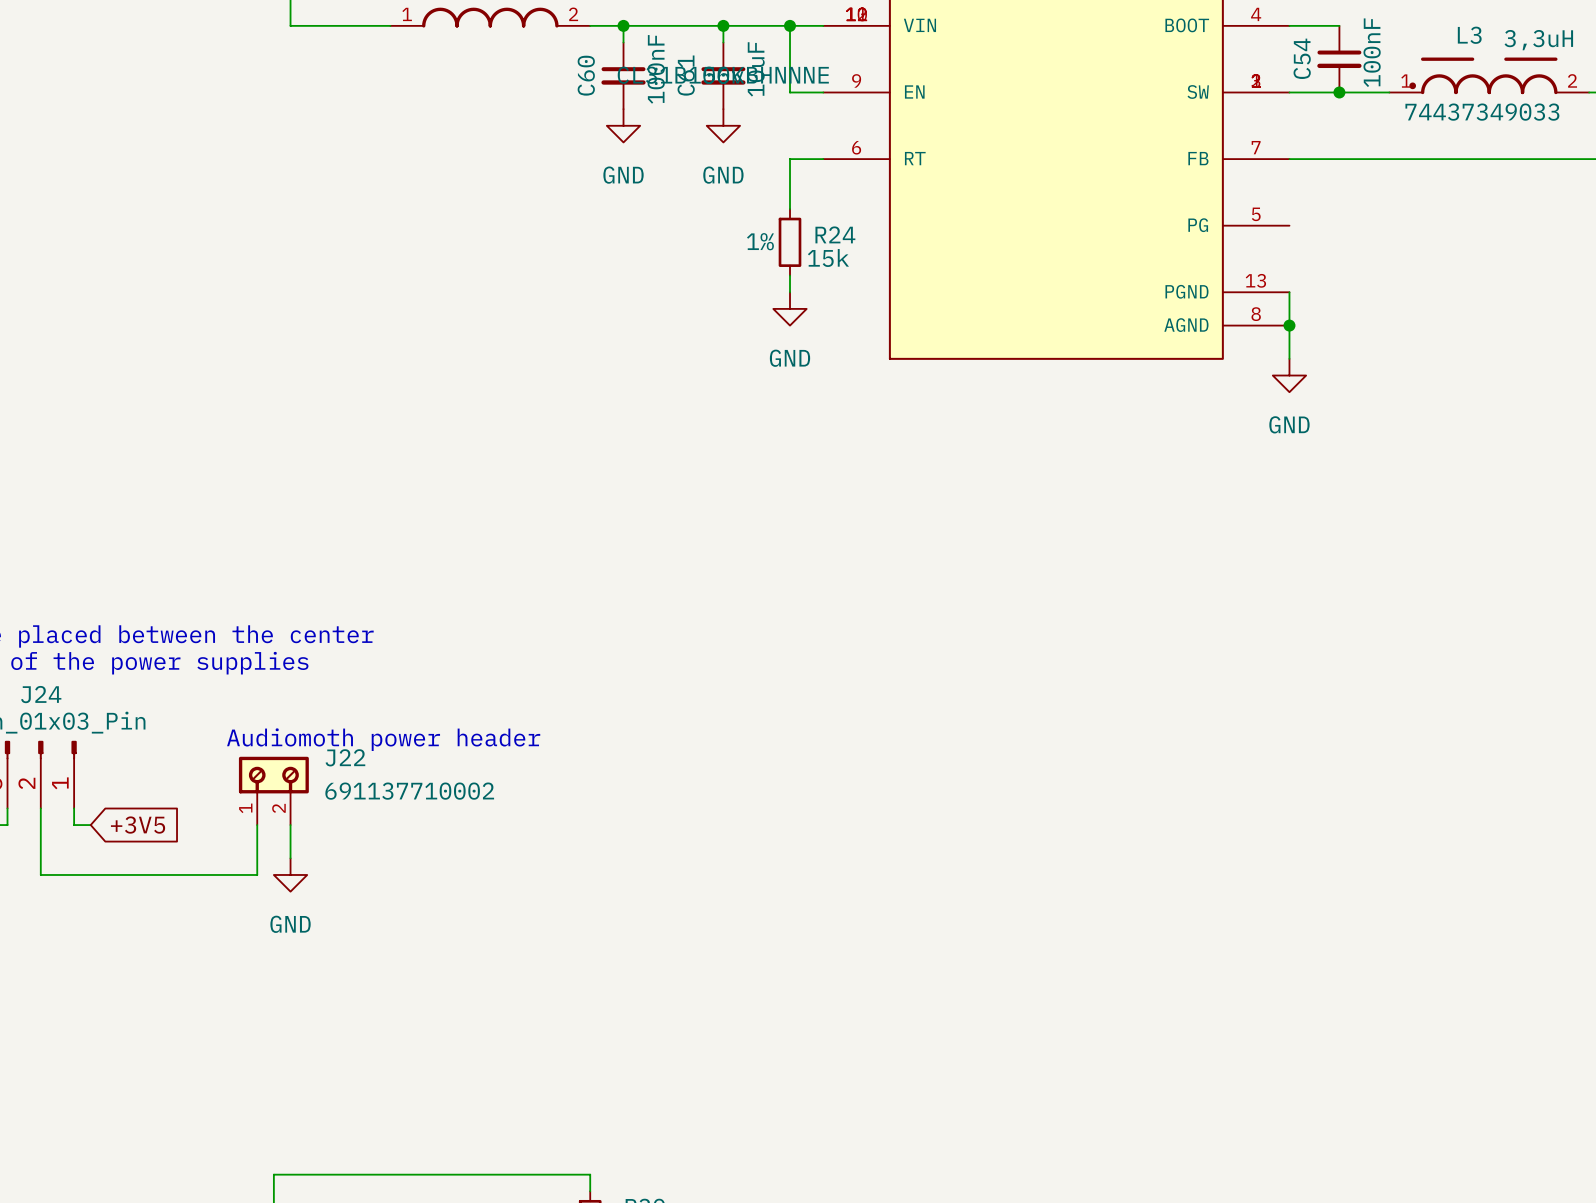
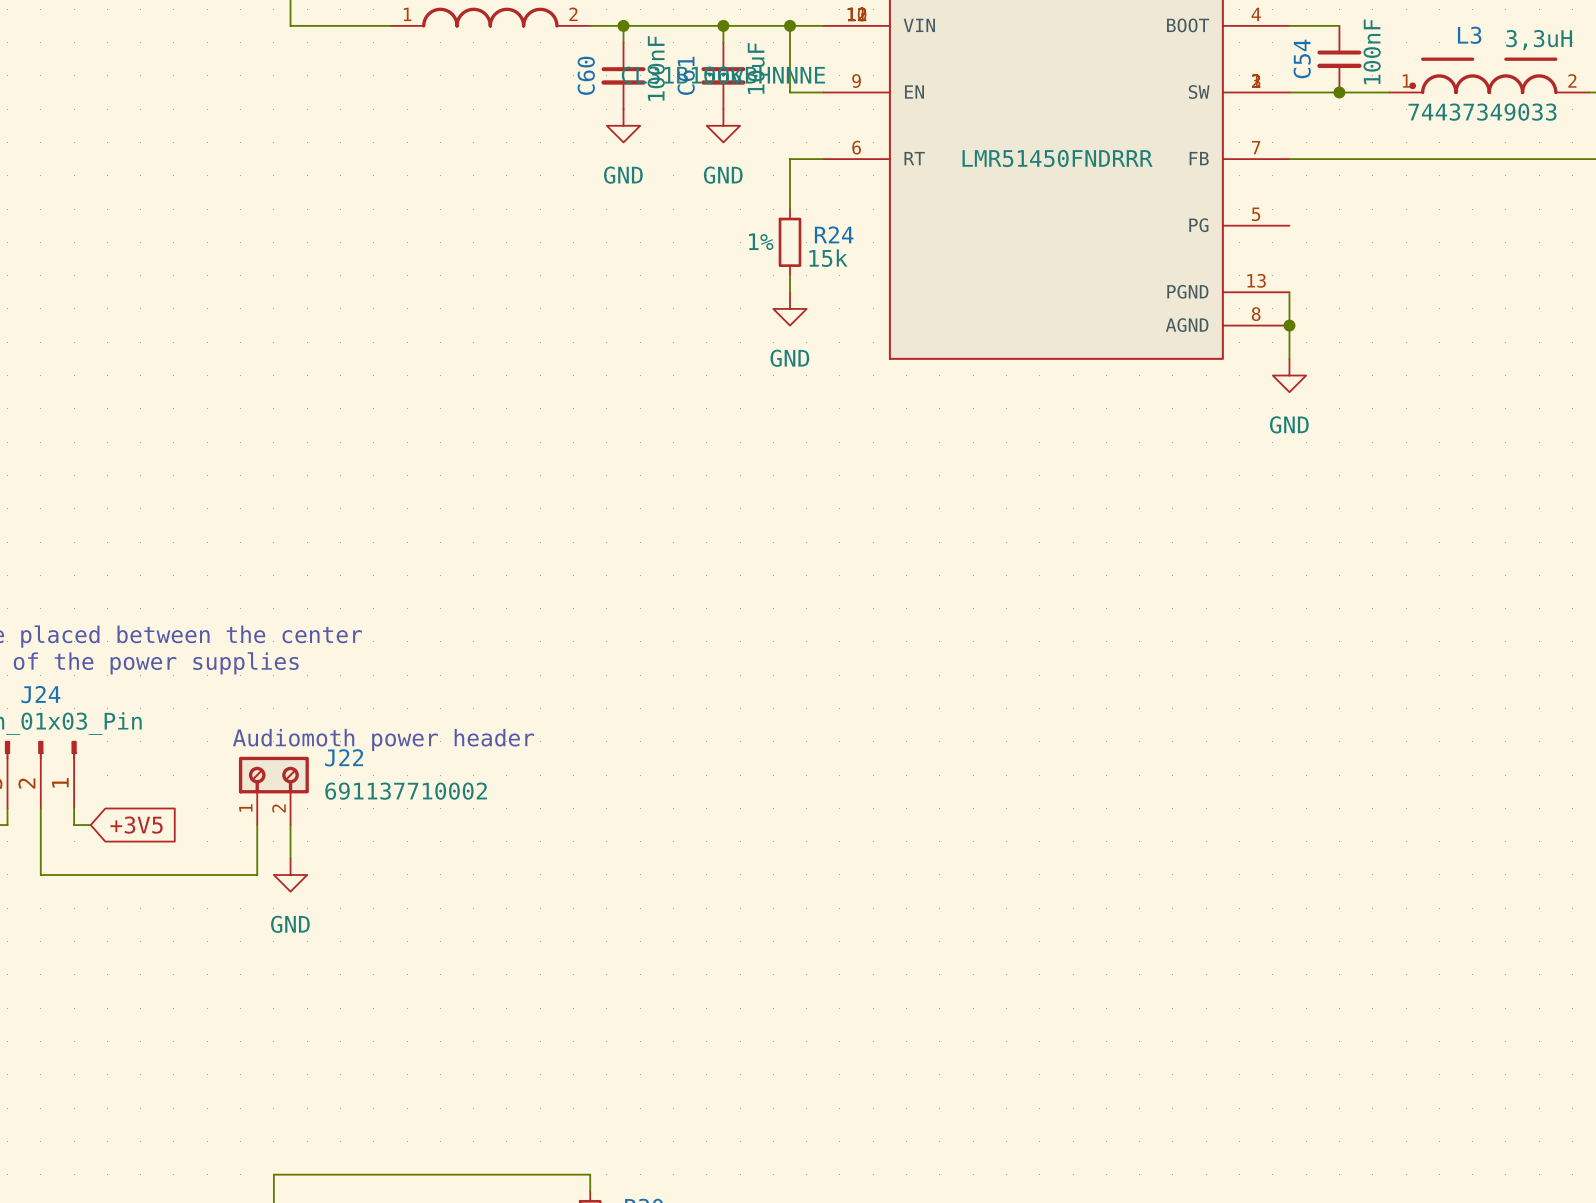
part text: none -> LMR51450FNDRRR (1057, 158)

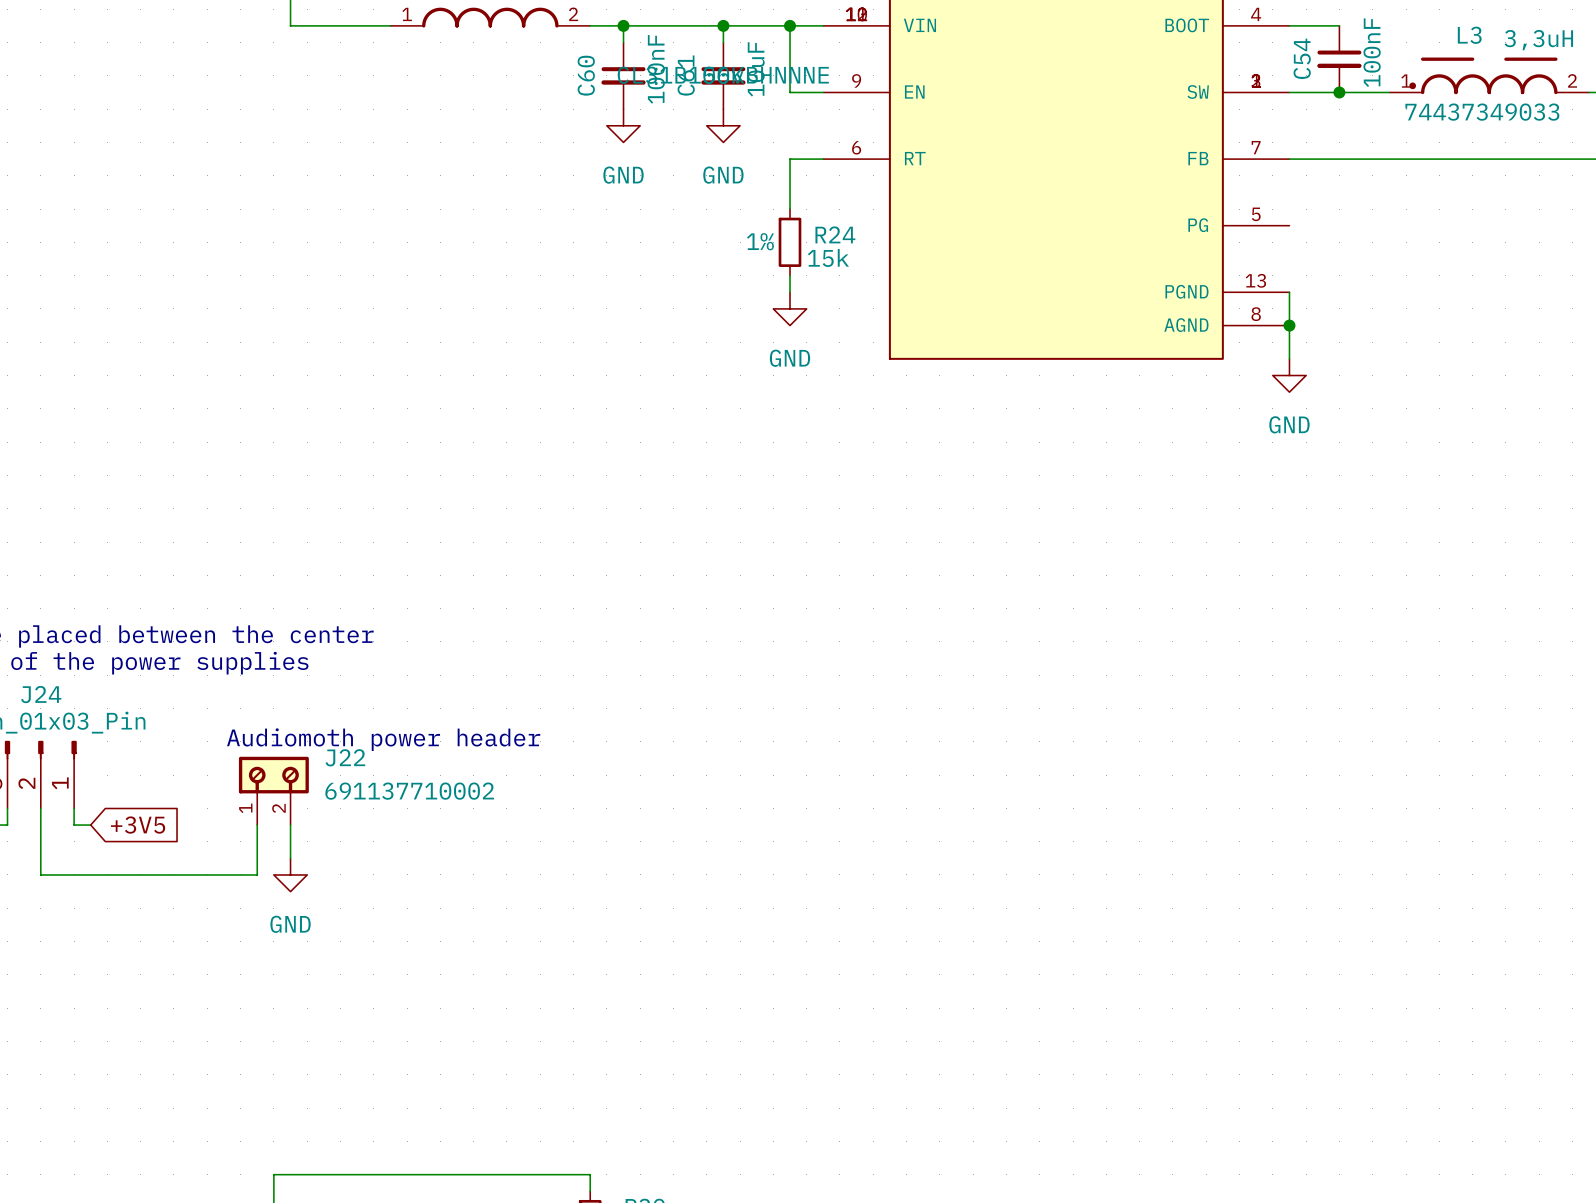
part text: LMR51450FNDRRR (1057, 158) -> none

